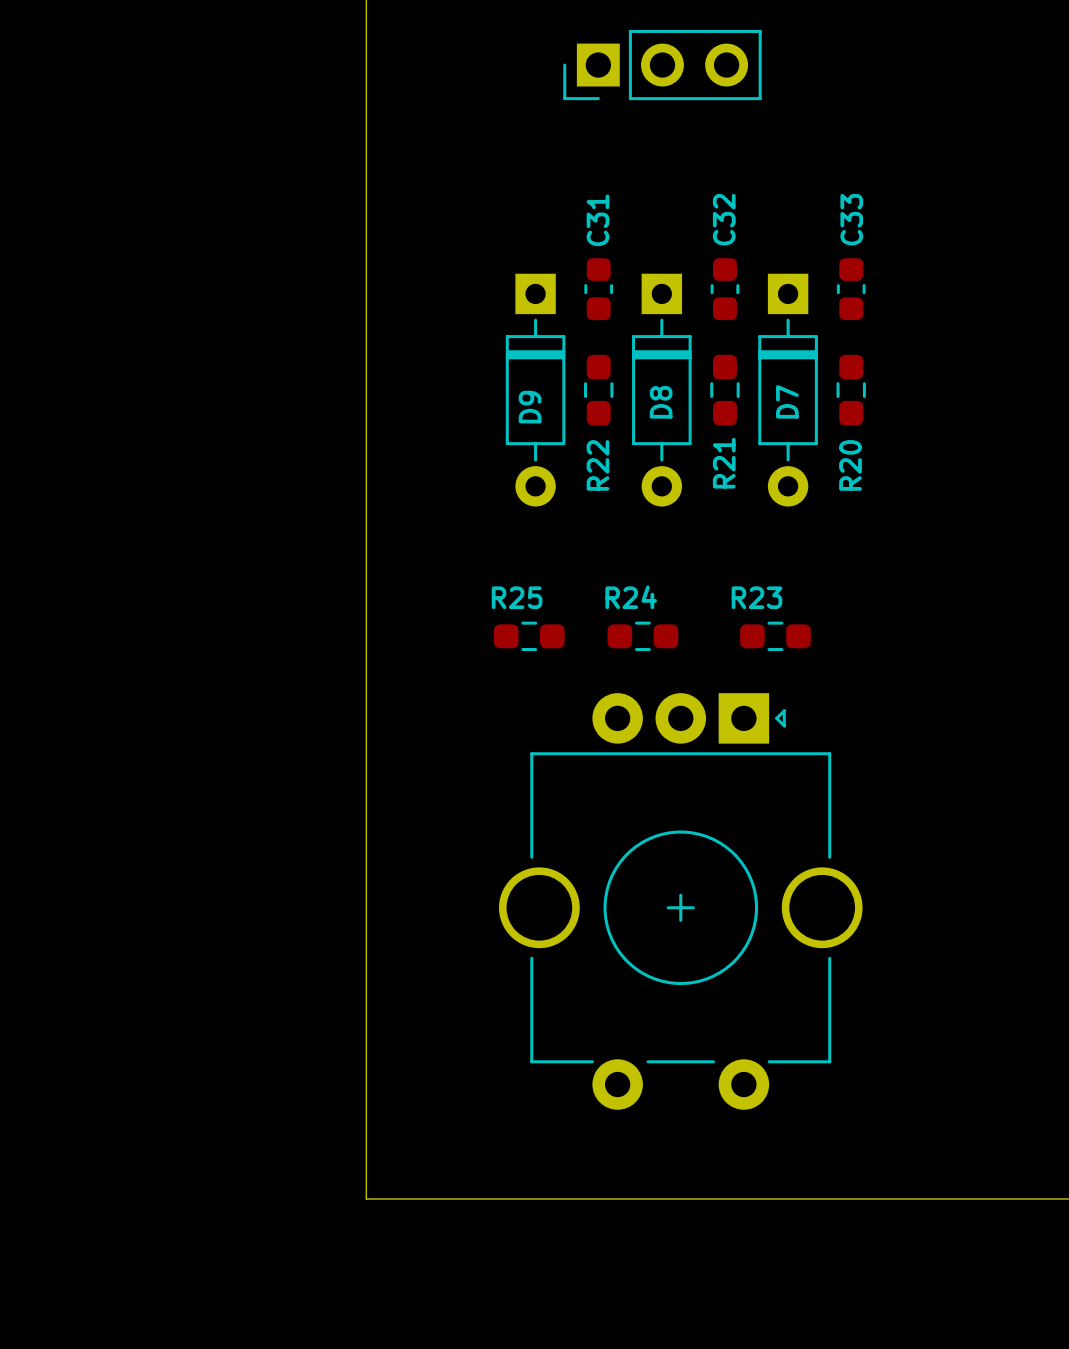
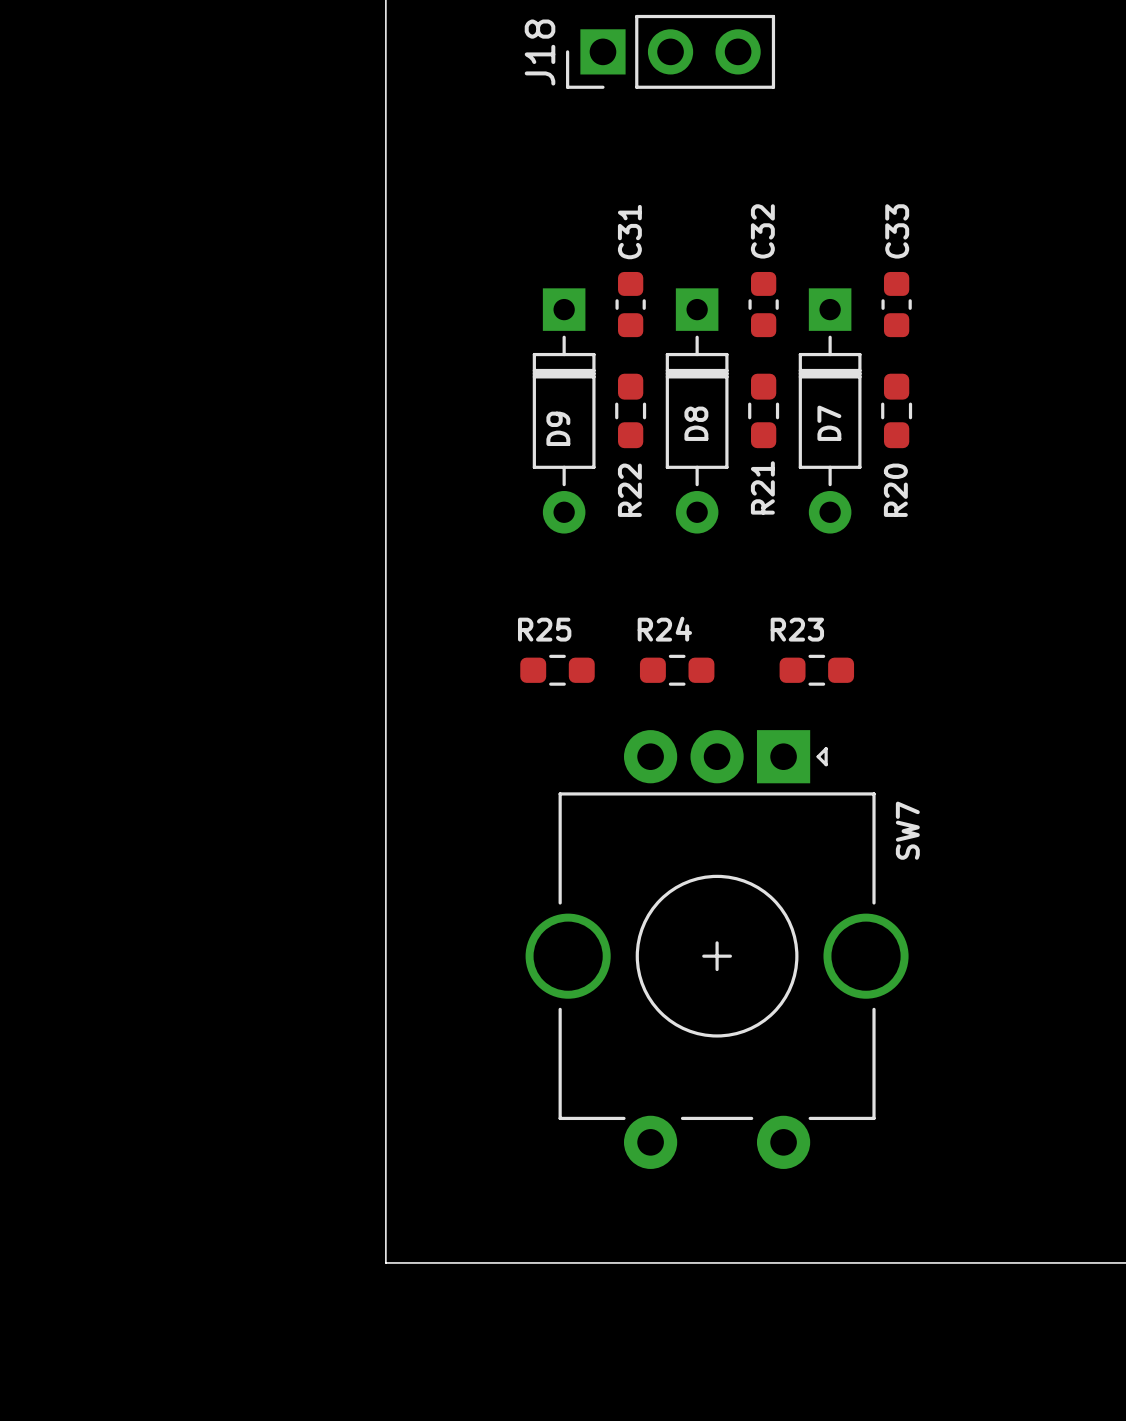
J18: none -> (670, 51)
part: (662, 65) -> none
SW7 name: none -> SW7 (907, 830)

